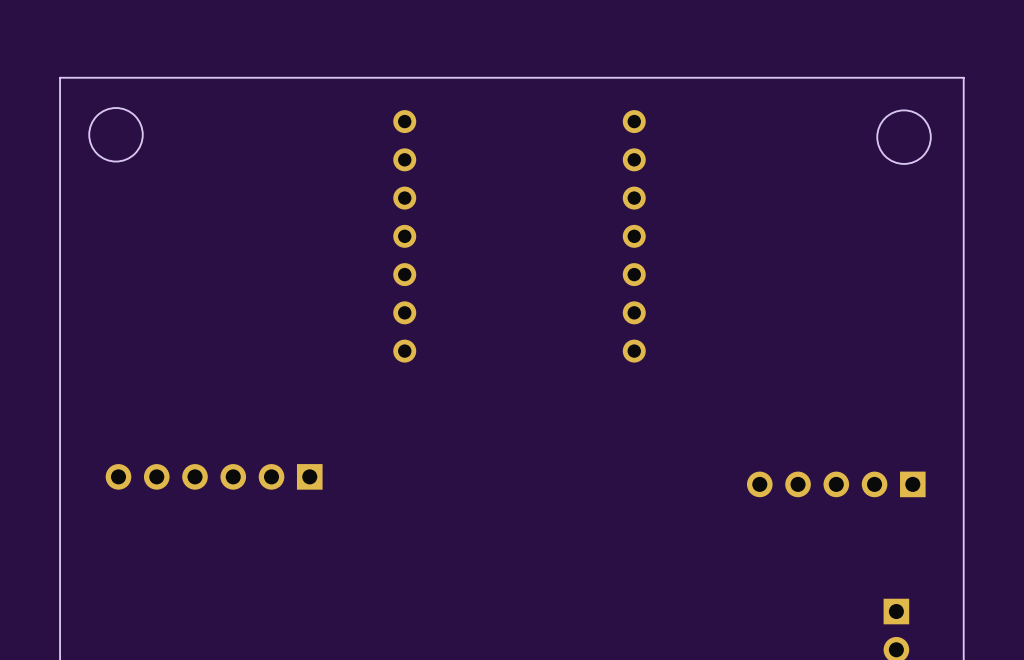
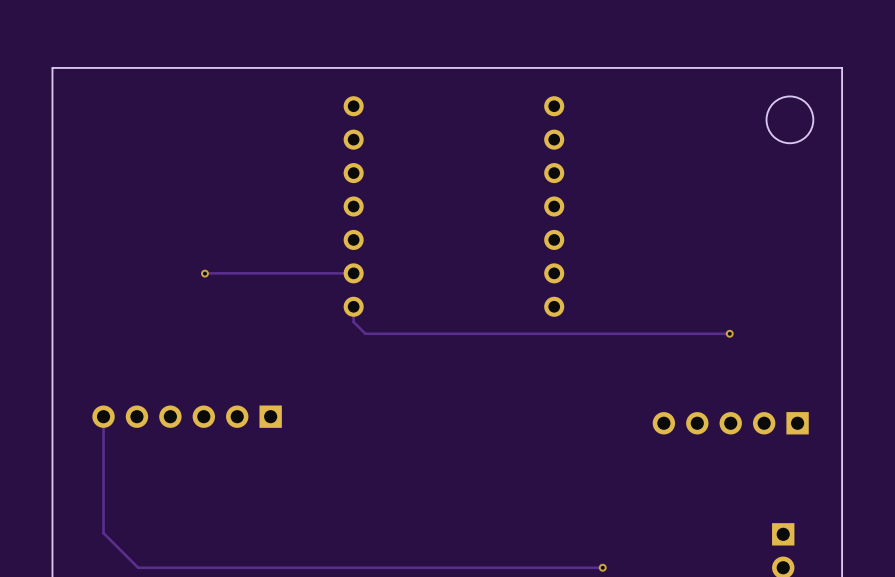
round board edge: [88, 107, 144, 162] -> none
track: none -> (353, 273) (204, 273)
via: none -> (204, 273)
track: none -> (353, 306) (353, 322) (365, 333) (729, 333)
via: none -> (729, 333)
track: none -> (103, 416) (103, 533) (138, 567) (602, 567)
via: none -> (602, 567)

